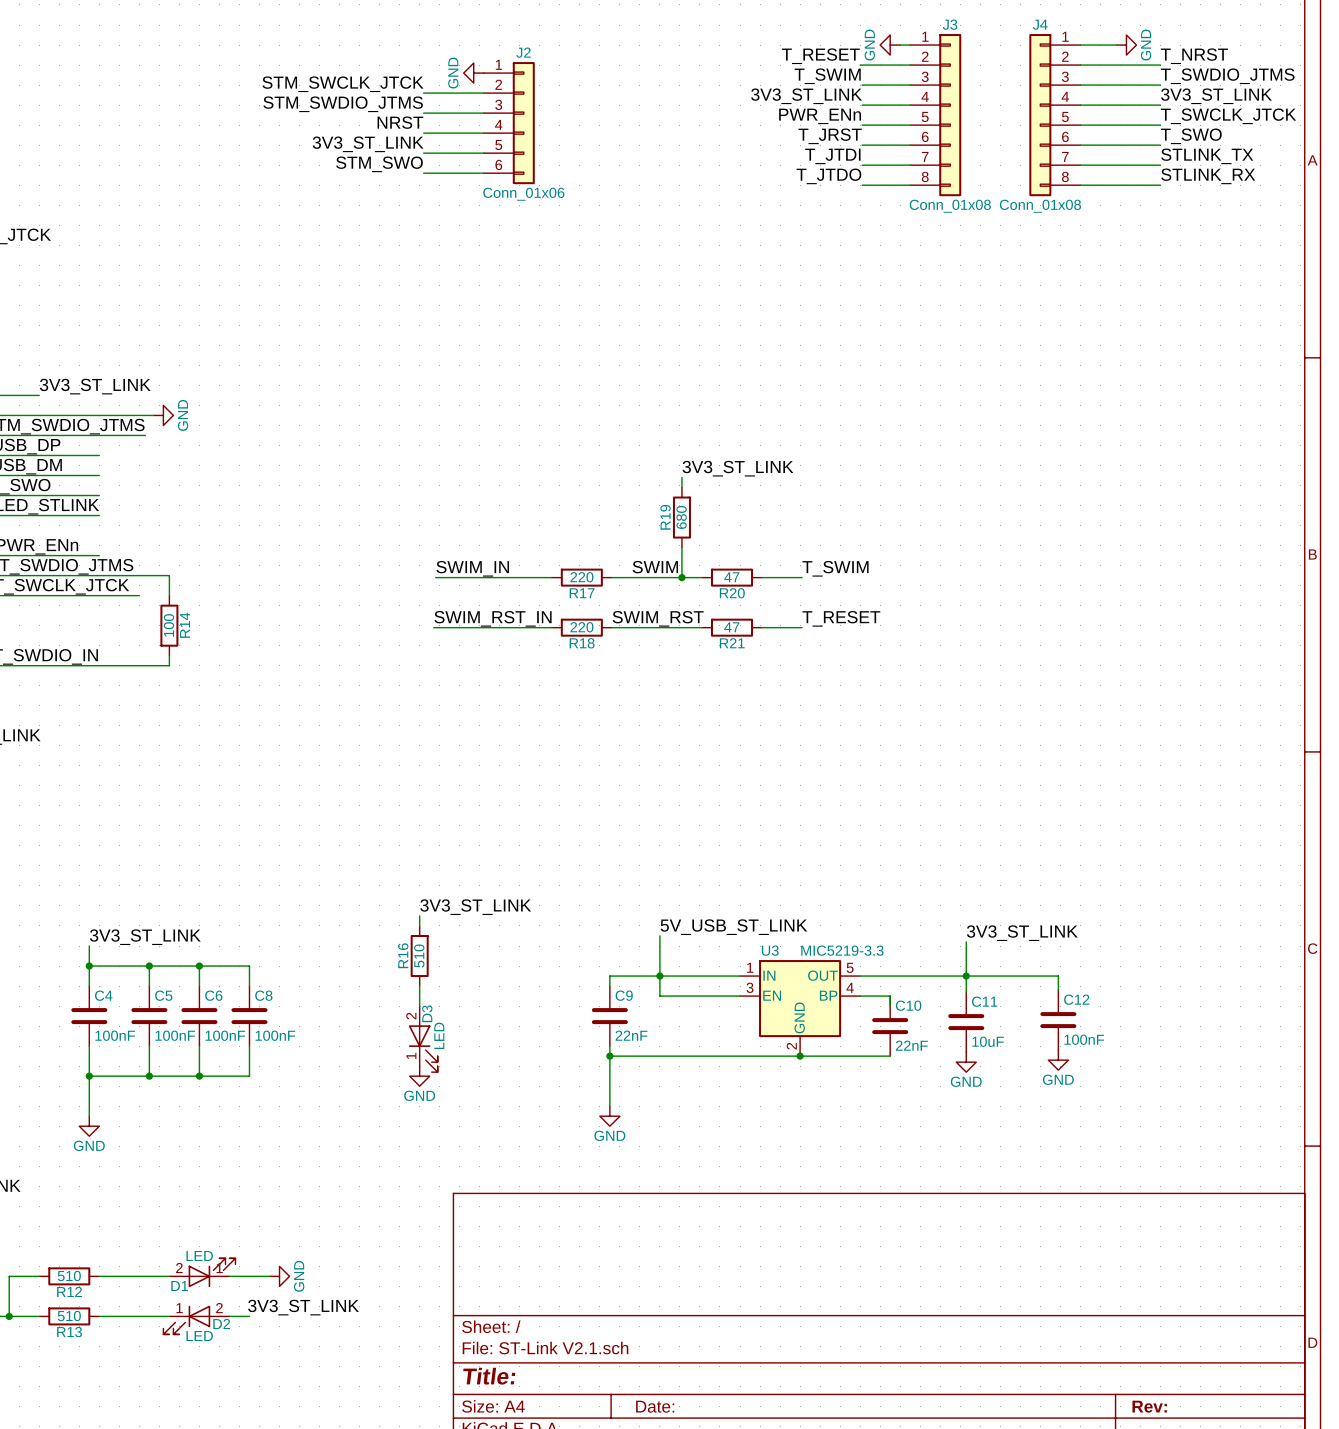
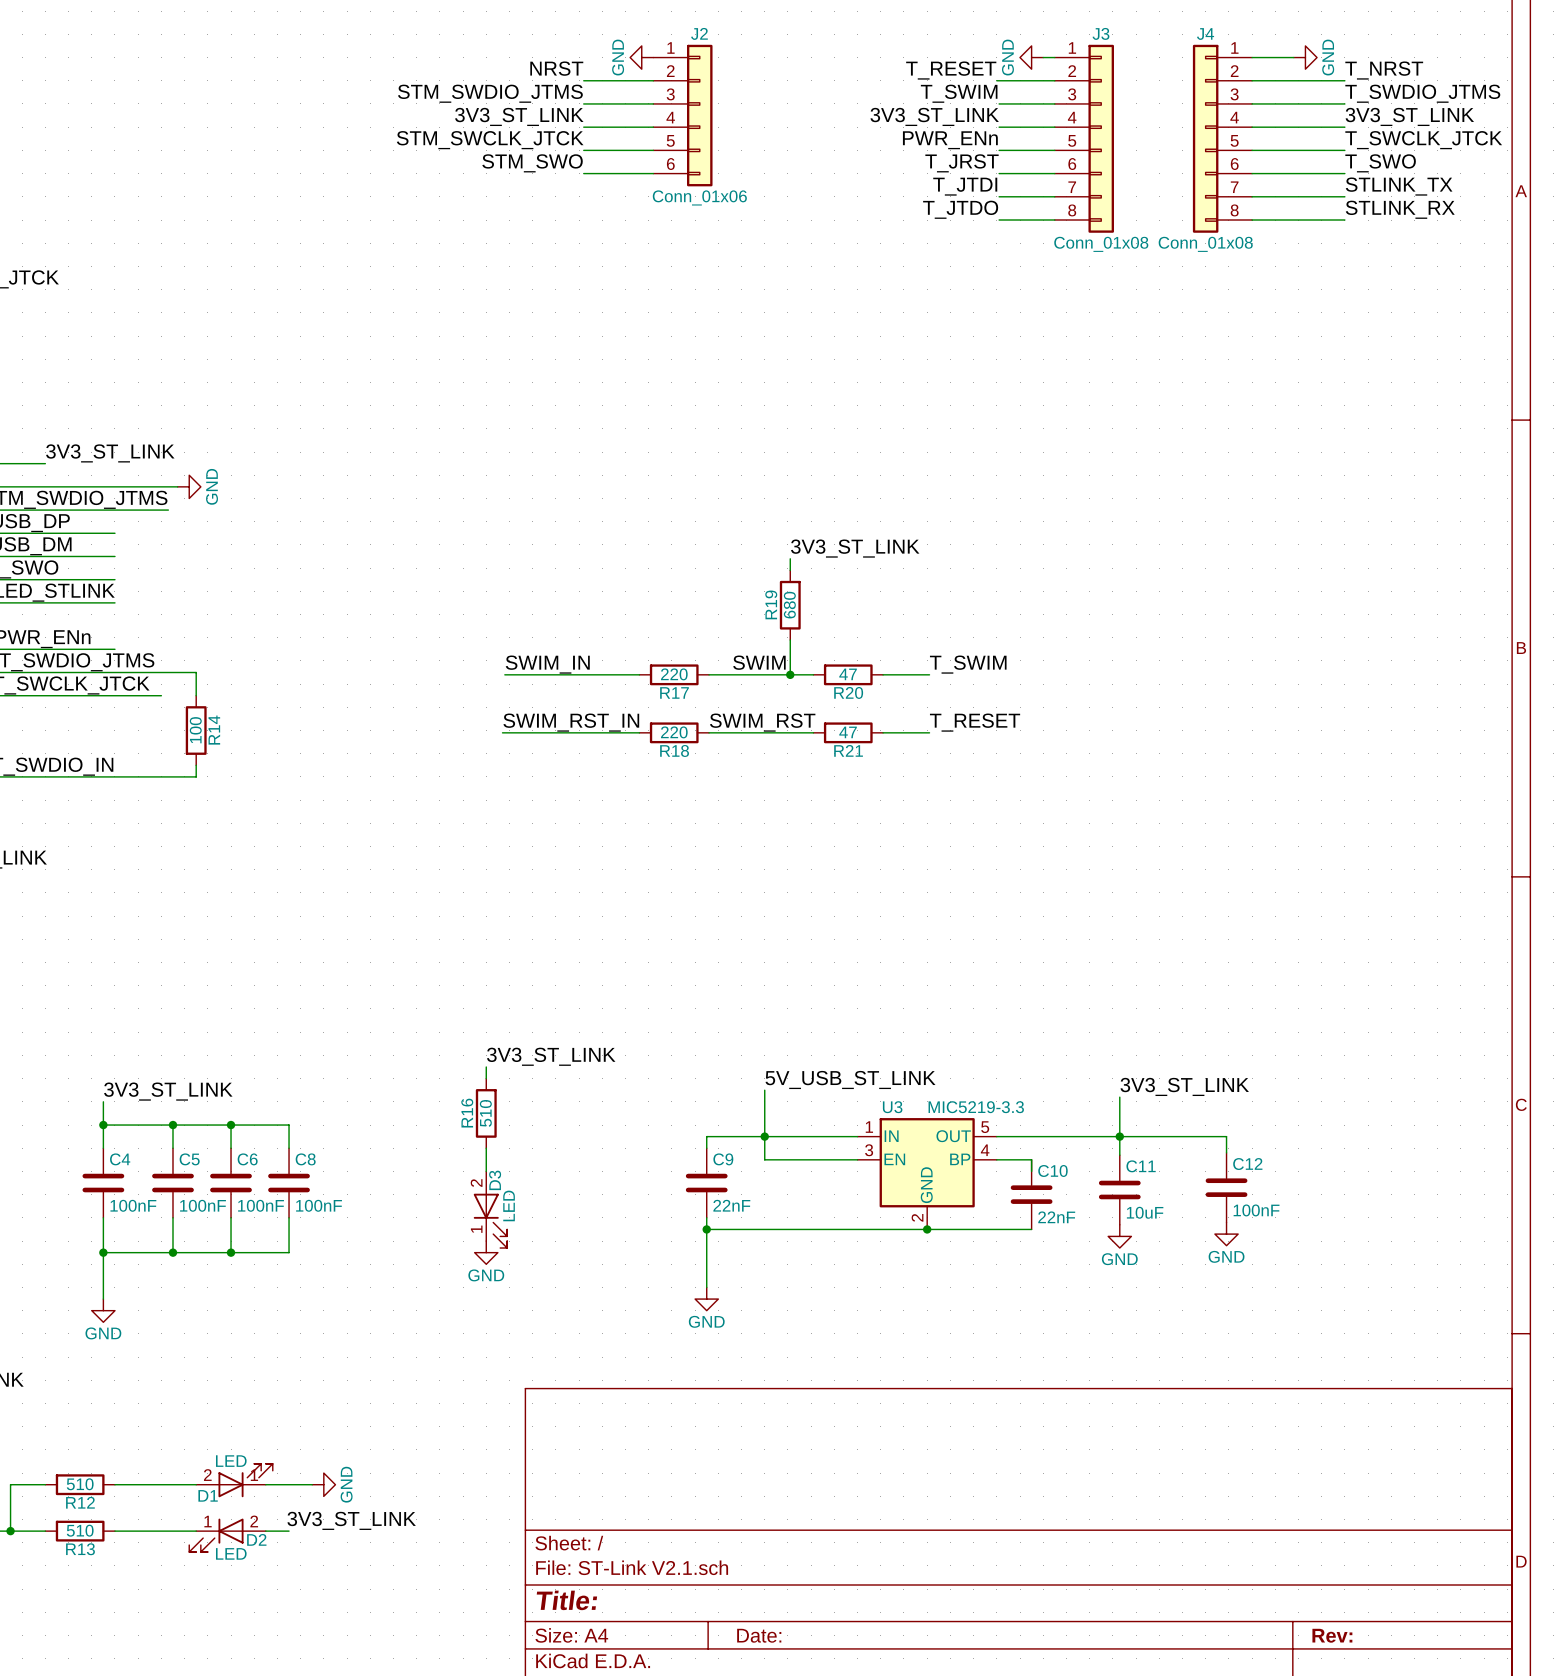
power symbol position: GND (473, 73) -> GND (641, 57)
label position: STM_SWCLK_JTCK (342, 84) -> STM_SWCLK_JTCK (490, 140)
wire: (423, 93) (483, 93) -> (583, 103) (653, 103)
label position: STM_SWDIO_JTMS (343, 104) -> STM_SWDIO_JTMS (490, 93)
wire: (423, 113) (483, 113) -> (583, 127) (653, 127)
label position: NRST (400, 122) -> NRST (556, 68)
J2 position: (509, 123) -> (682, 115)
wire: (423, 133) (483, 133) -> (583, 150) (653, 150)
label position: 3V3_ST_LINK (368, 144) -> 3V3_ST_LINK (519, 116)
wire: (423, 153) (483, 153) -> (583, 173) (653, 173)
label position: STM_SWO (379, 164) -> STM_SWO (532, 163)
wire: (423, 173) (483, 173) -> (583, 80) (653, 80)

